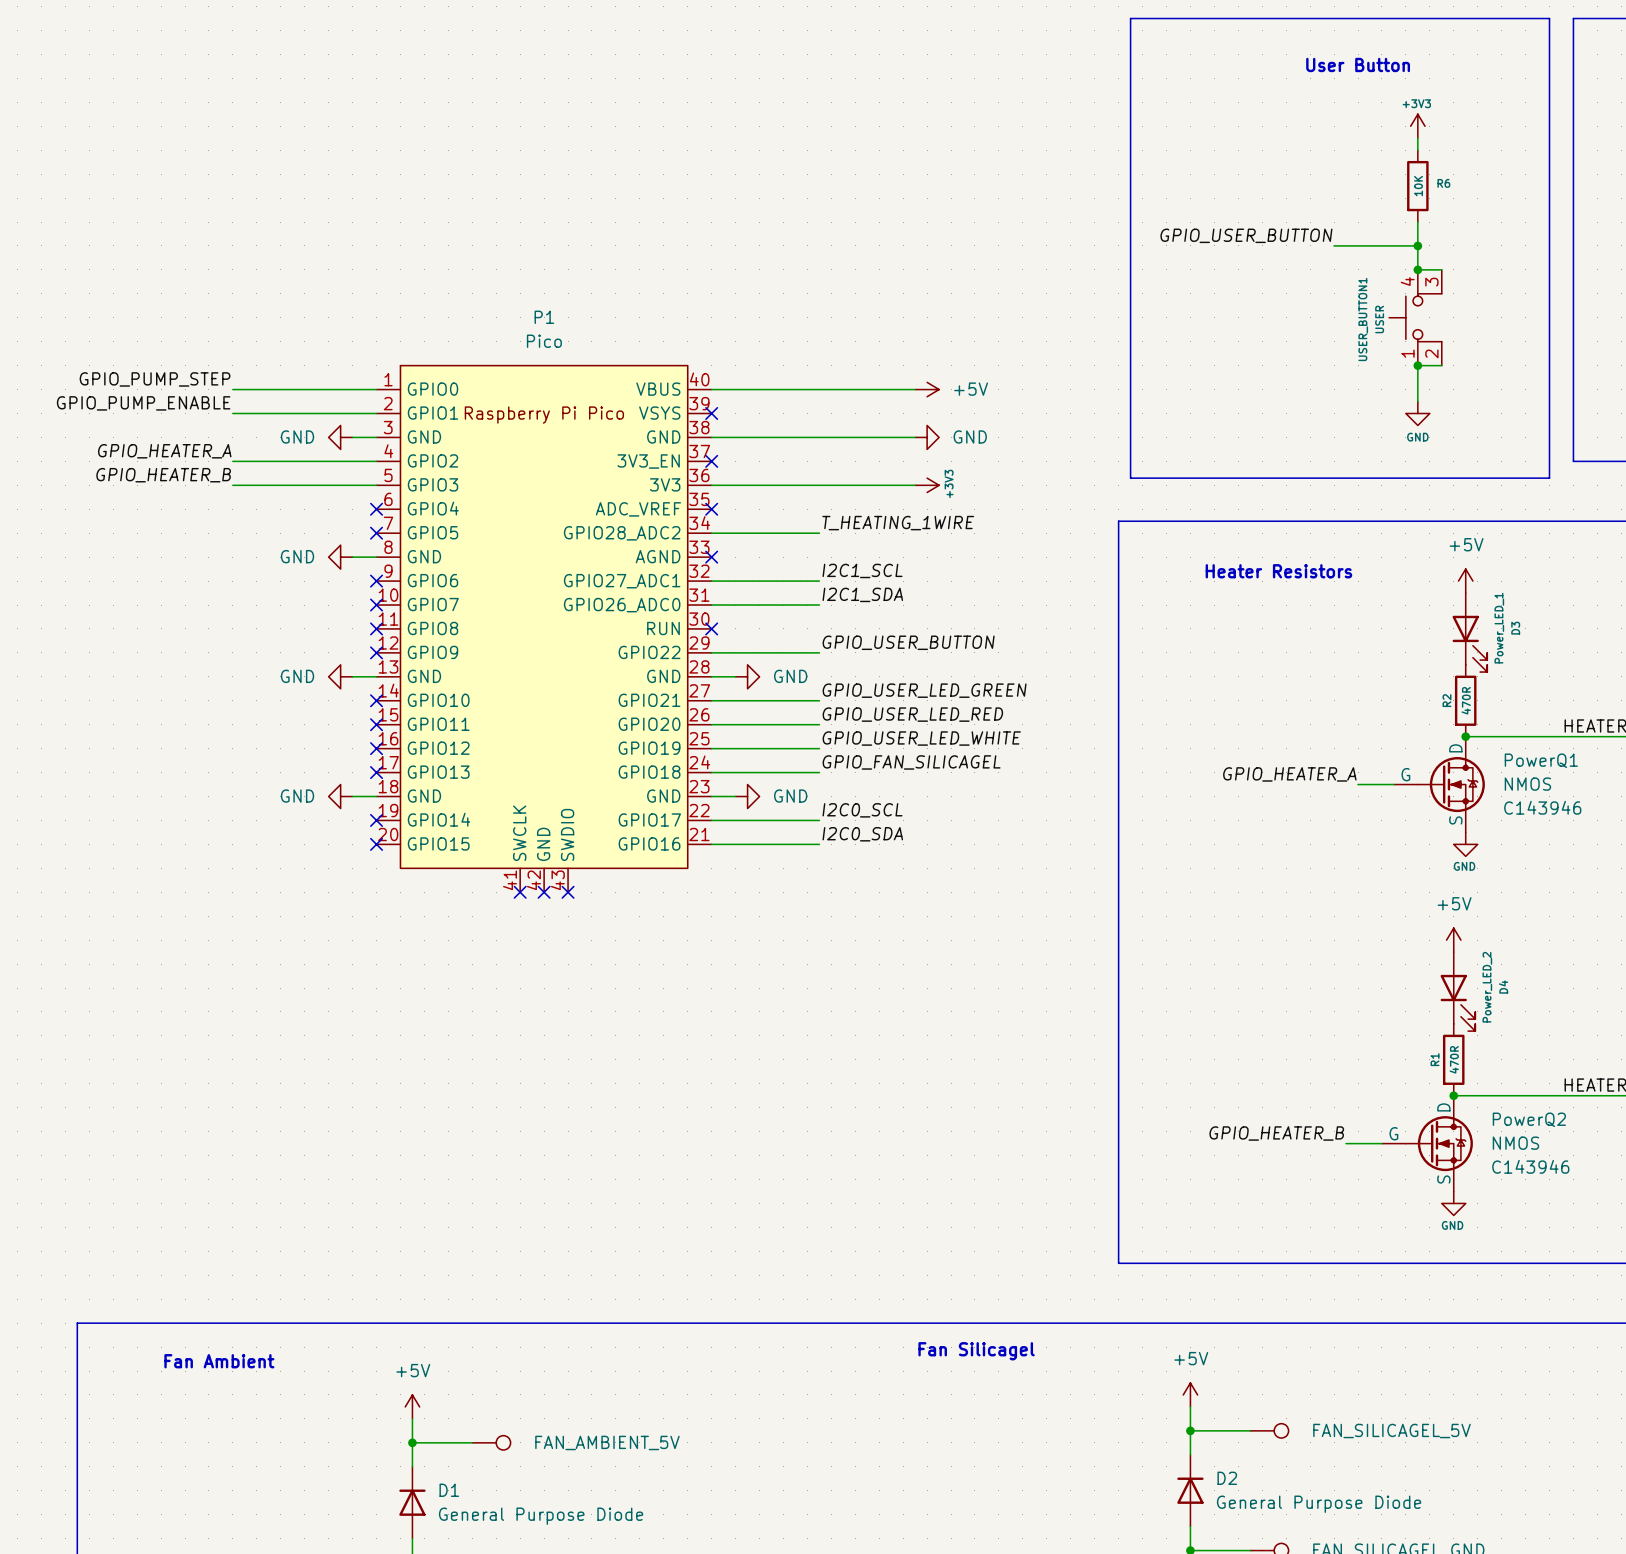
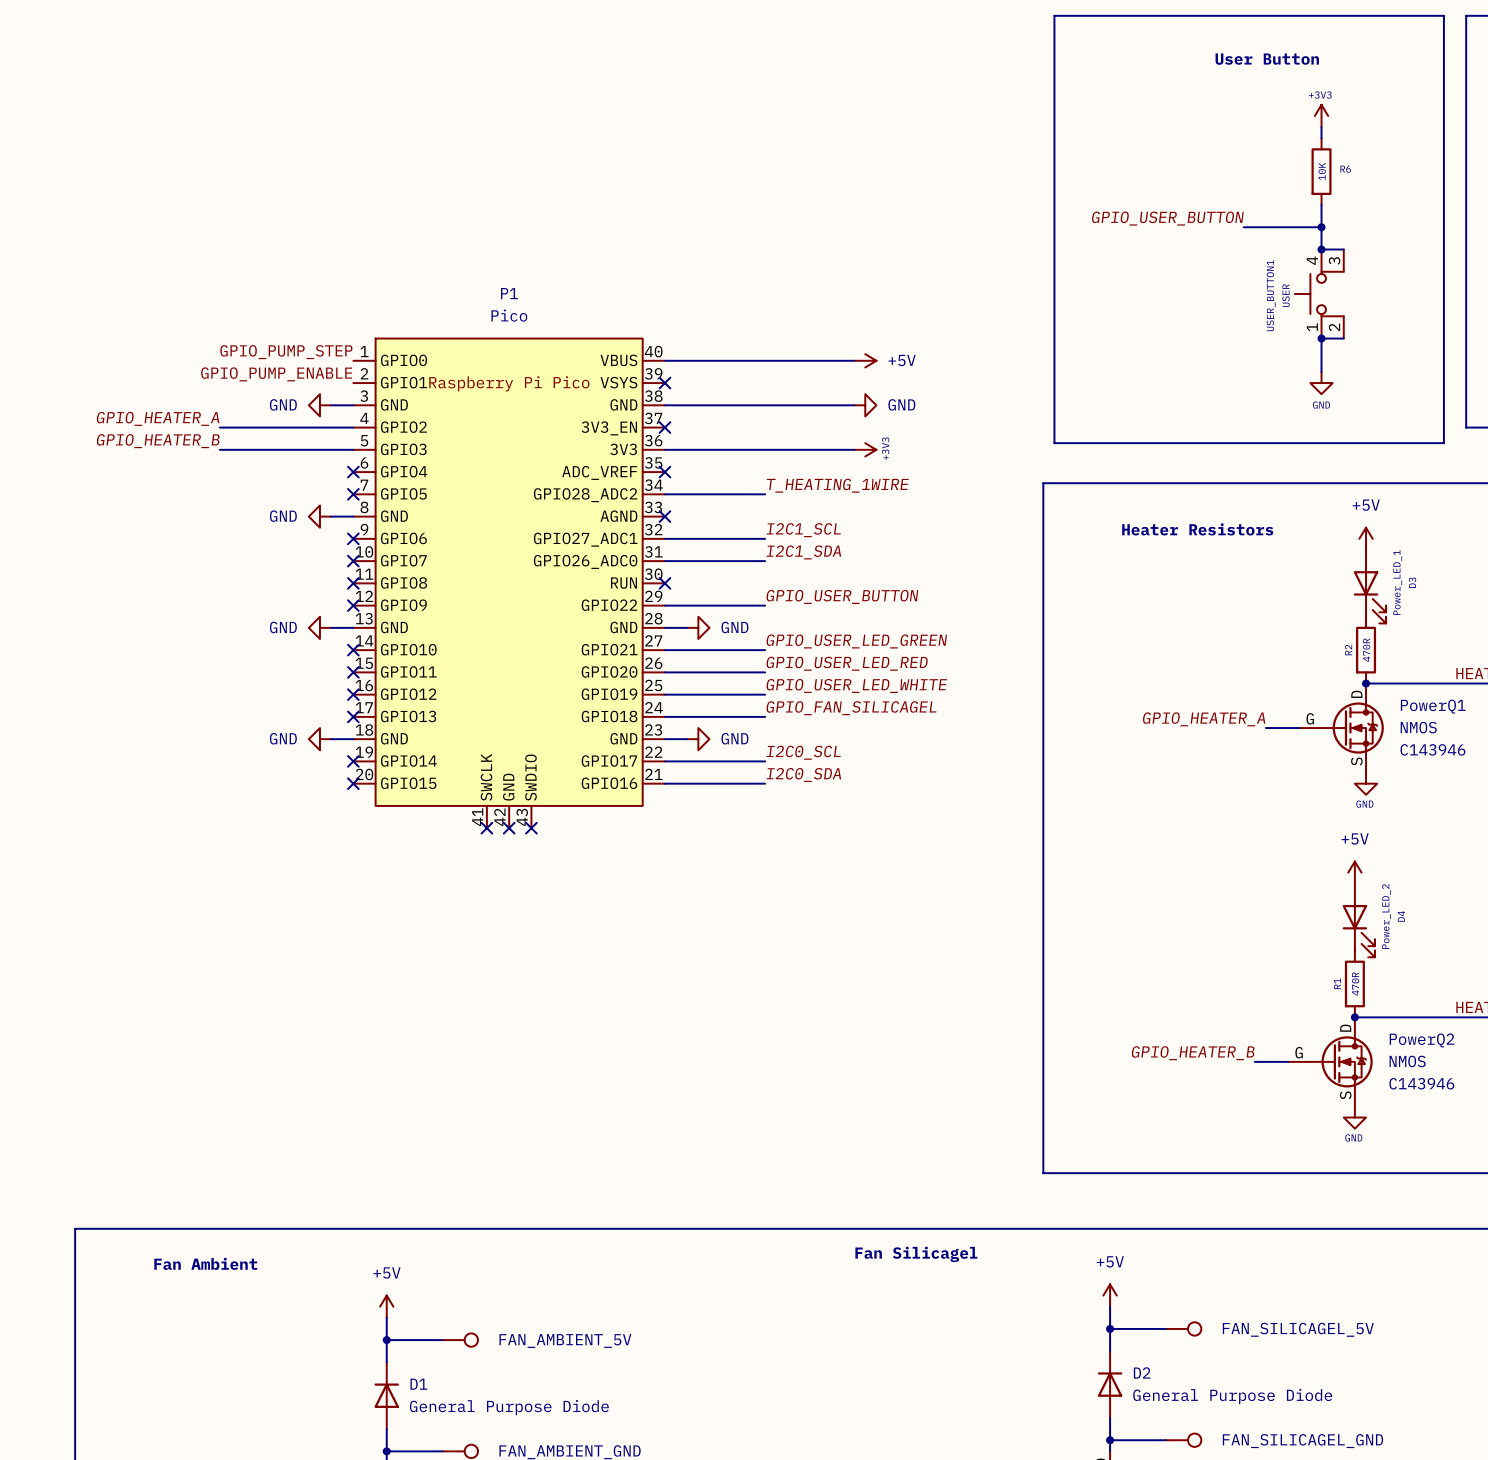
label position: GPIO_PUMP_STEP (155, 379) -> GPIO_PUMP_STEP (286, 352)
wire: (232, 389) (376, 389) -> none
label position: GPIO_PUMP_ENABLE (143, 403) -> GPIO_PUMP_ENABLE (276, 374)
wire: (232, 413) (376, 413) -> none

